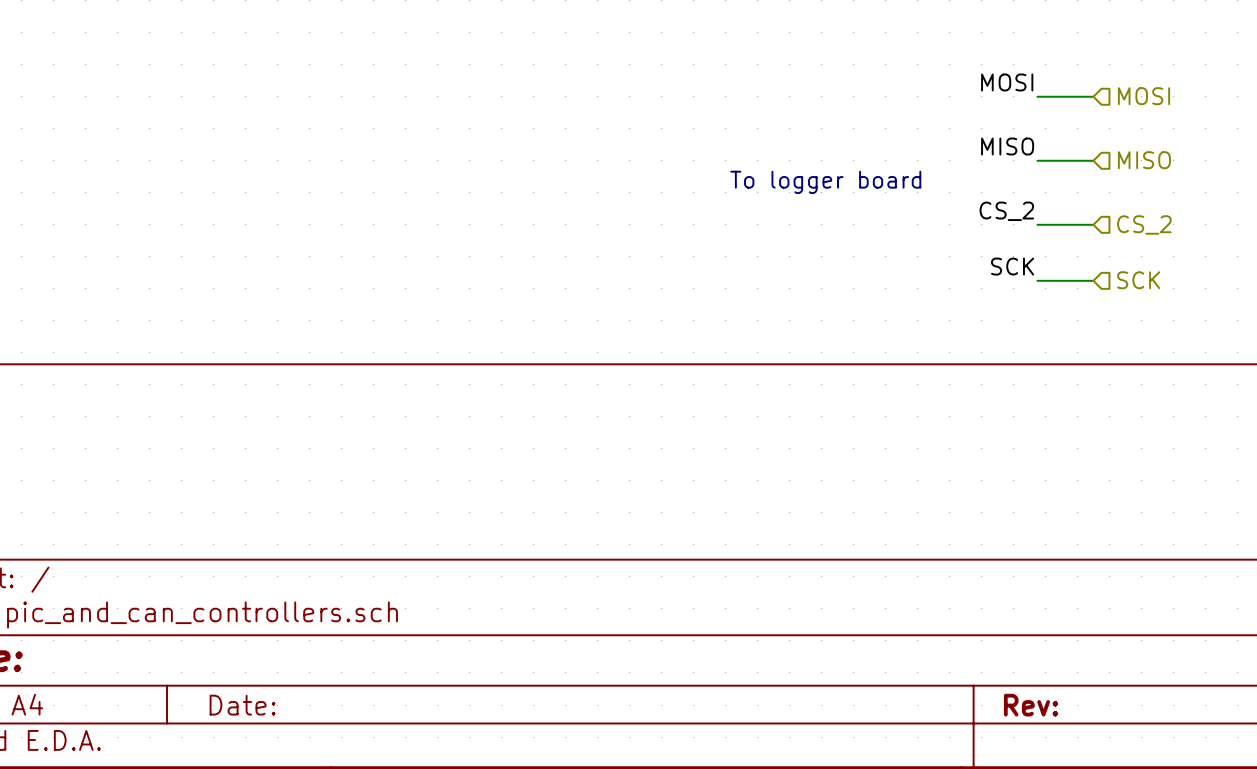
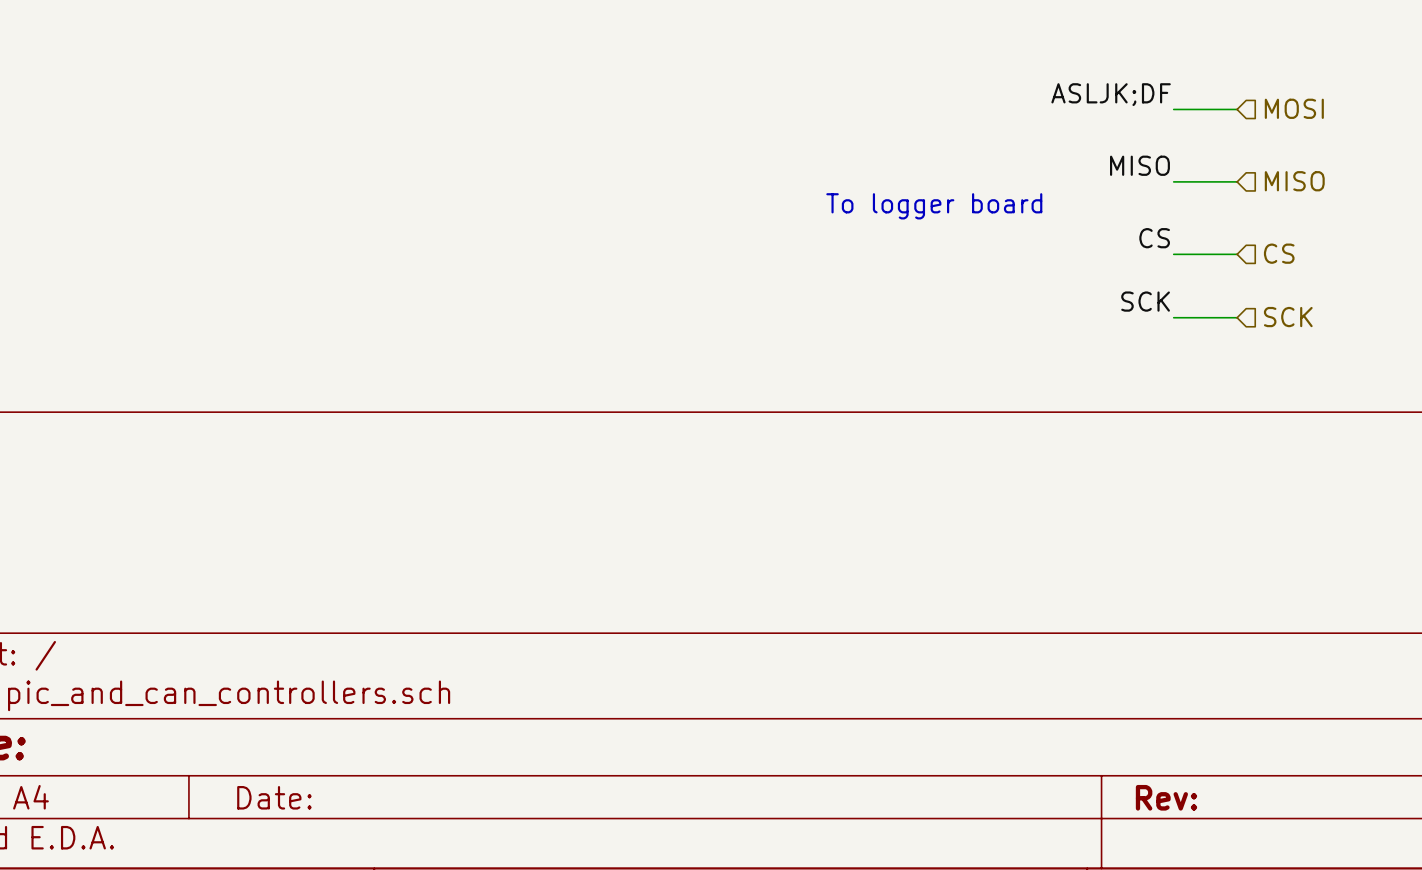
label: MOSI (1007, 82) -> ASLJK;DF (1111, 94)
label: CS_2 (1006, 211) -> CS (1154, 238)
hierarchical label: CS_2 (1144, 224) -> CS (1279, 253)

